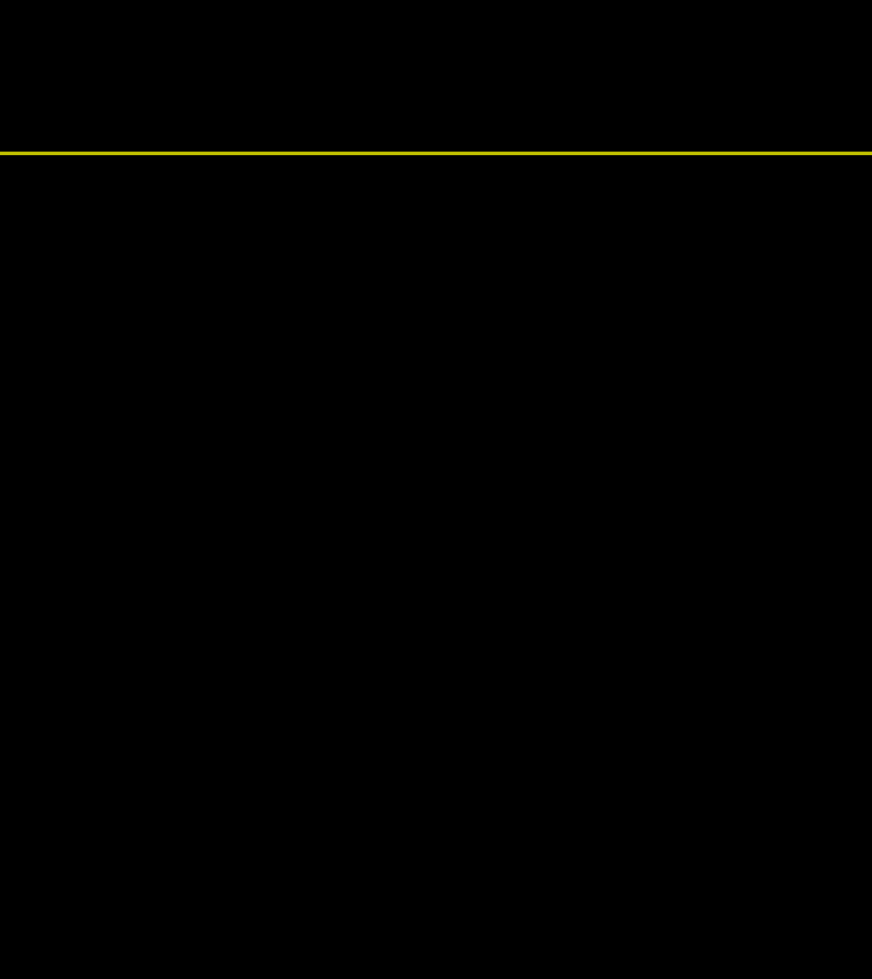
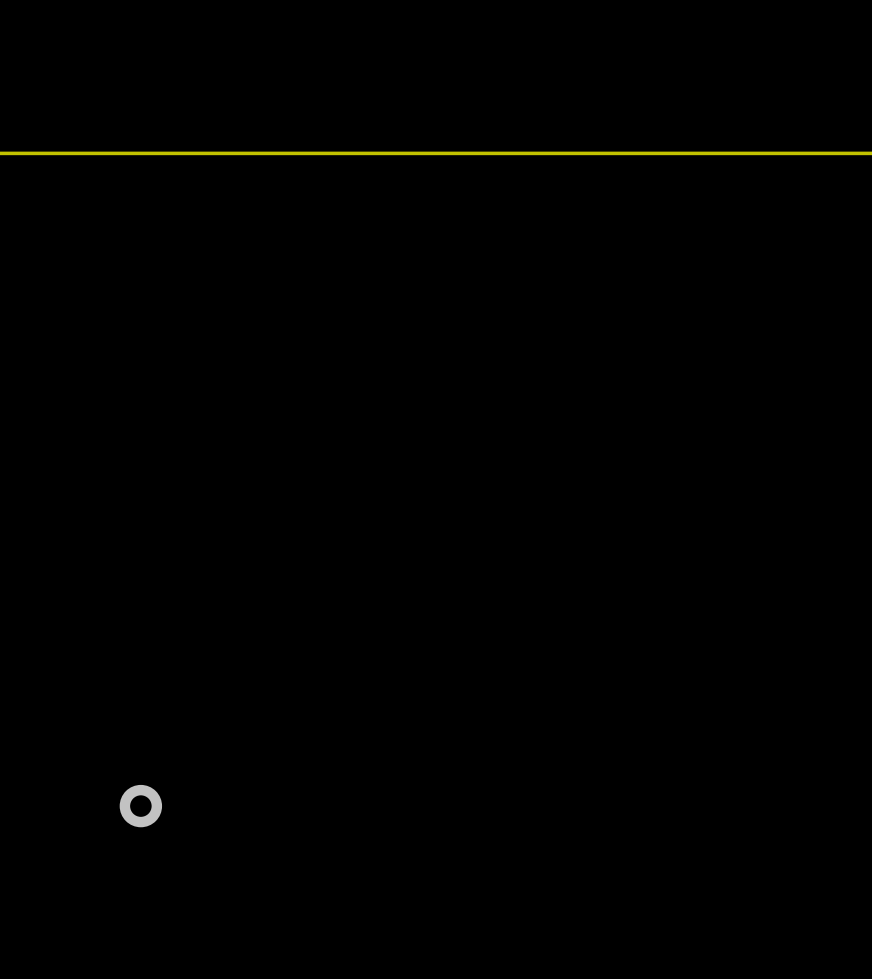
via: none -> (140, 806)

